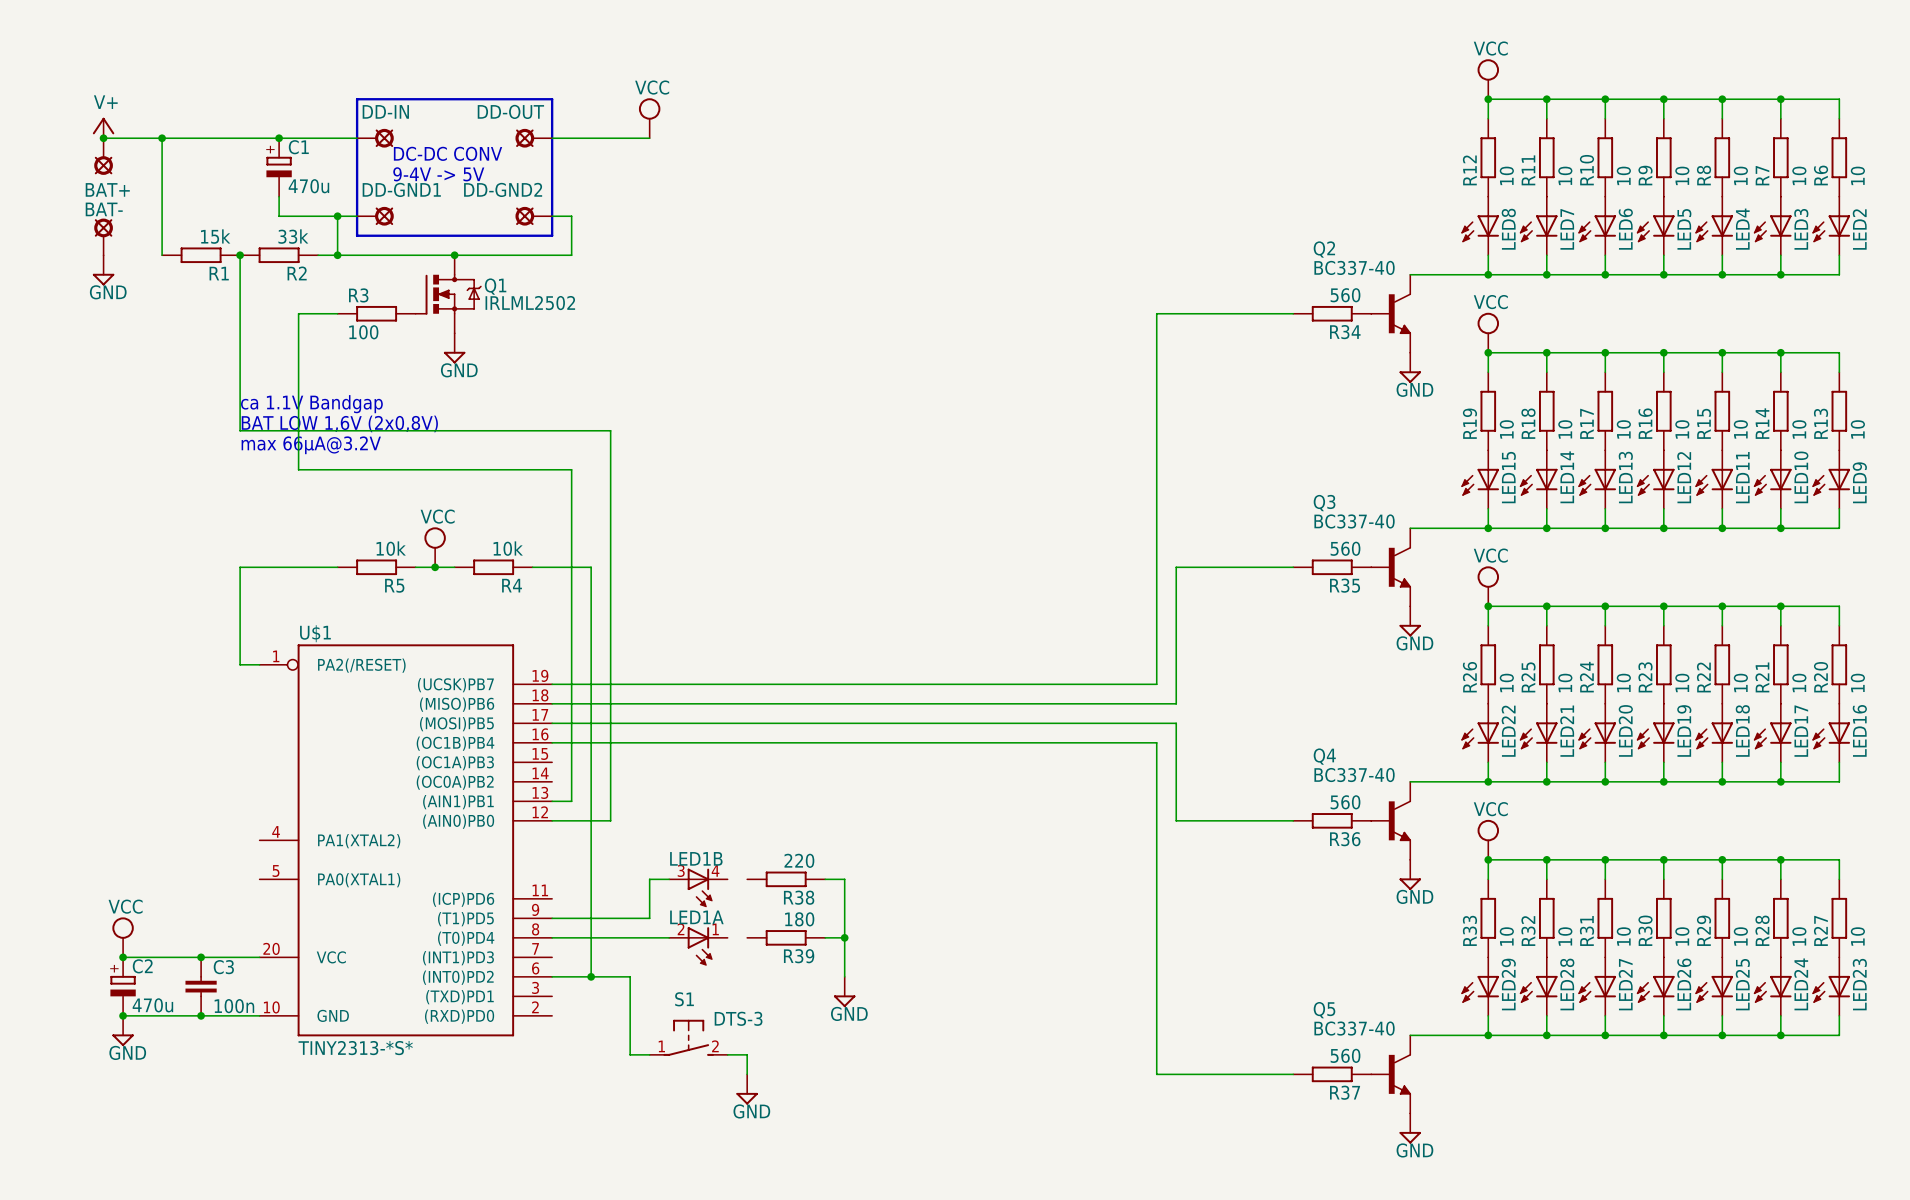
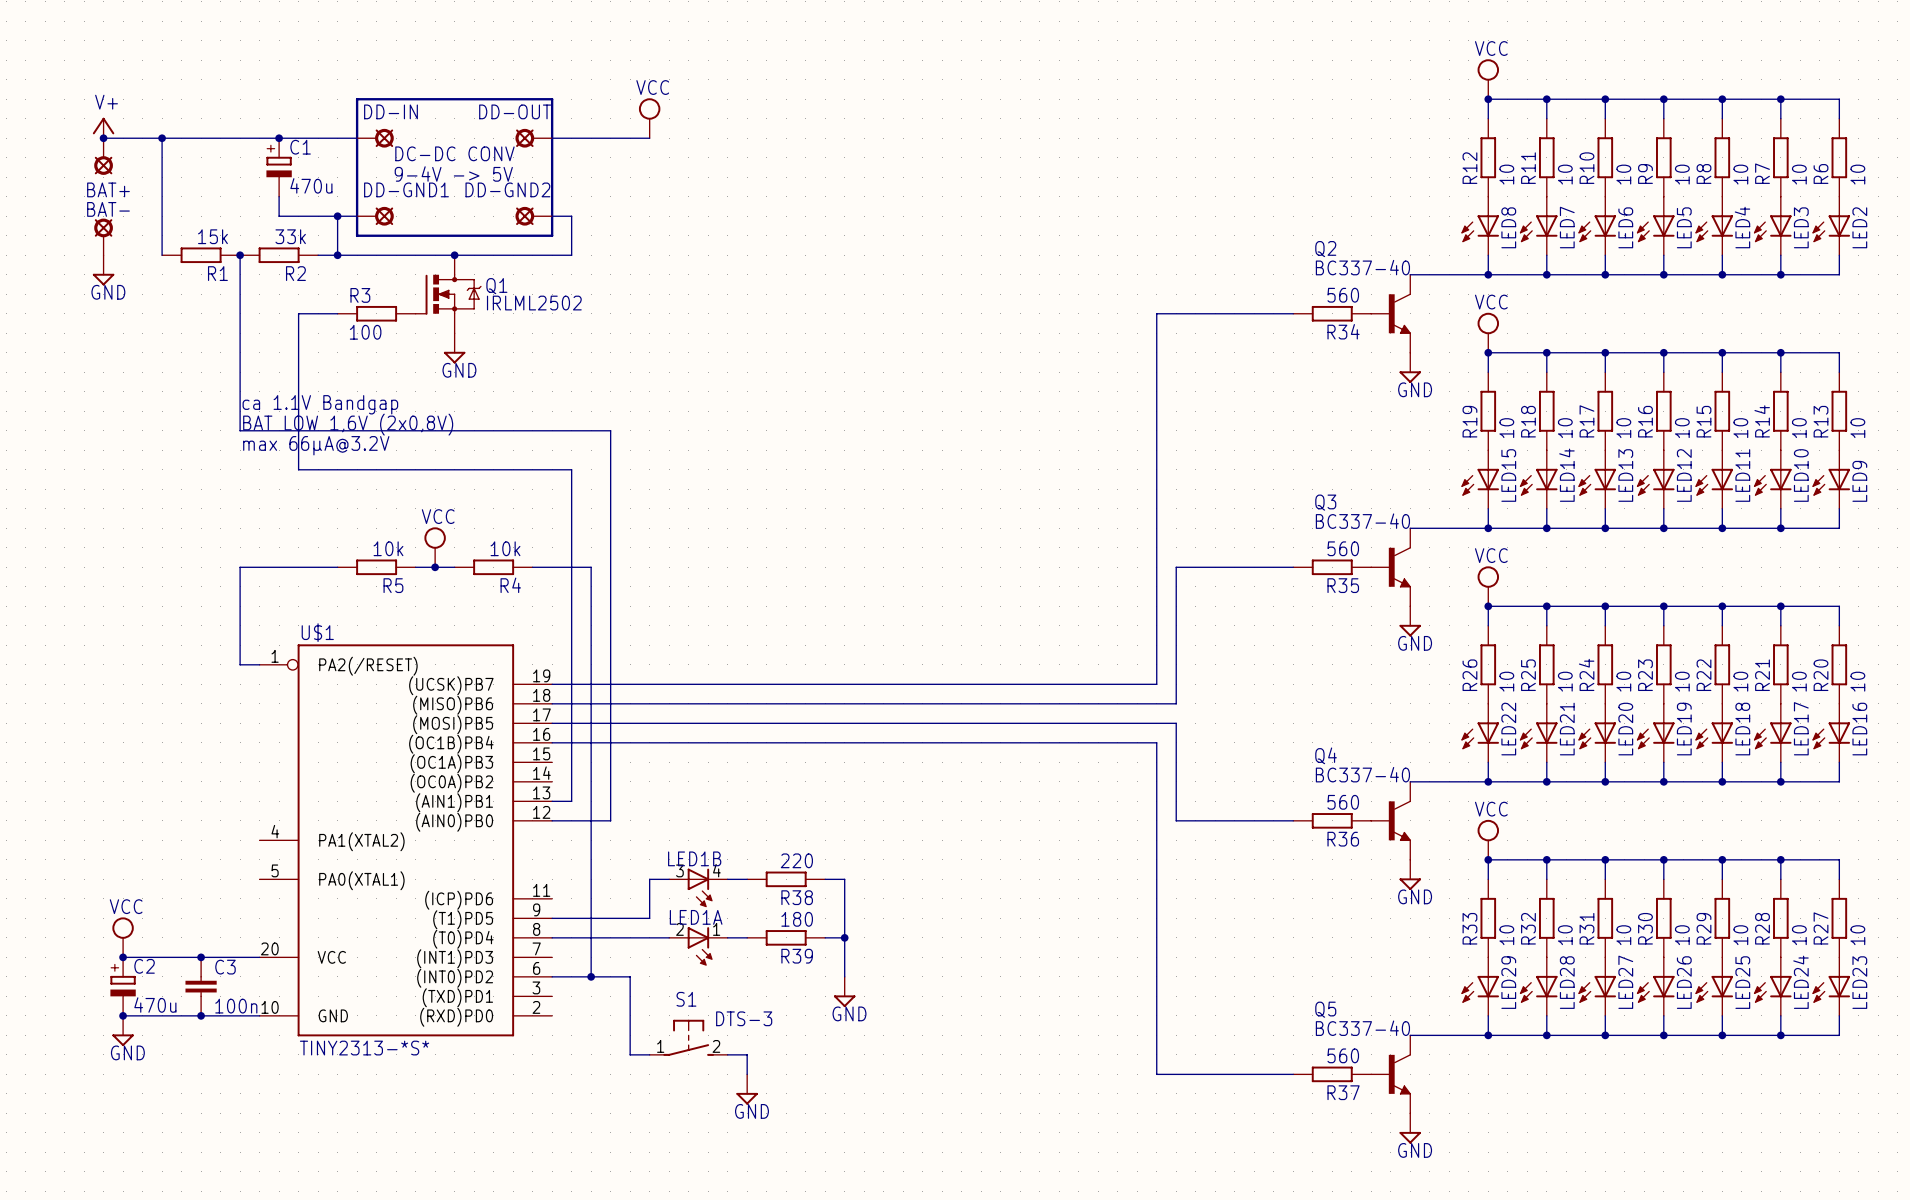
wire: none -> (727, 879) (747, 879)
wire: none -> (727, 937) (747, 937)

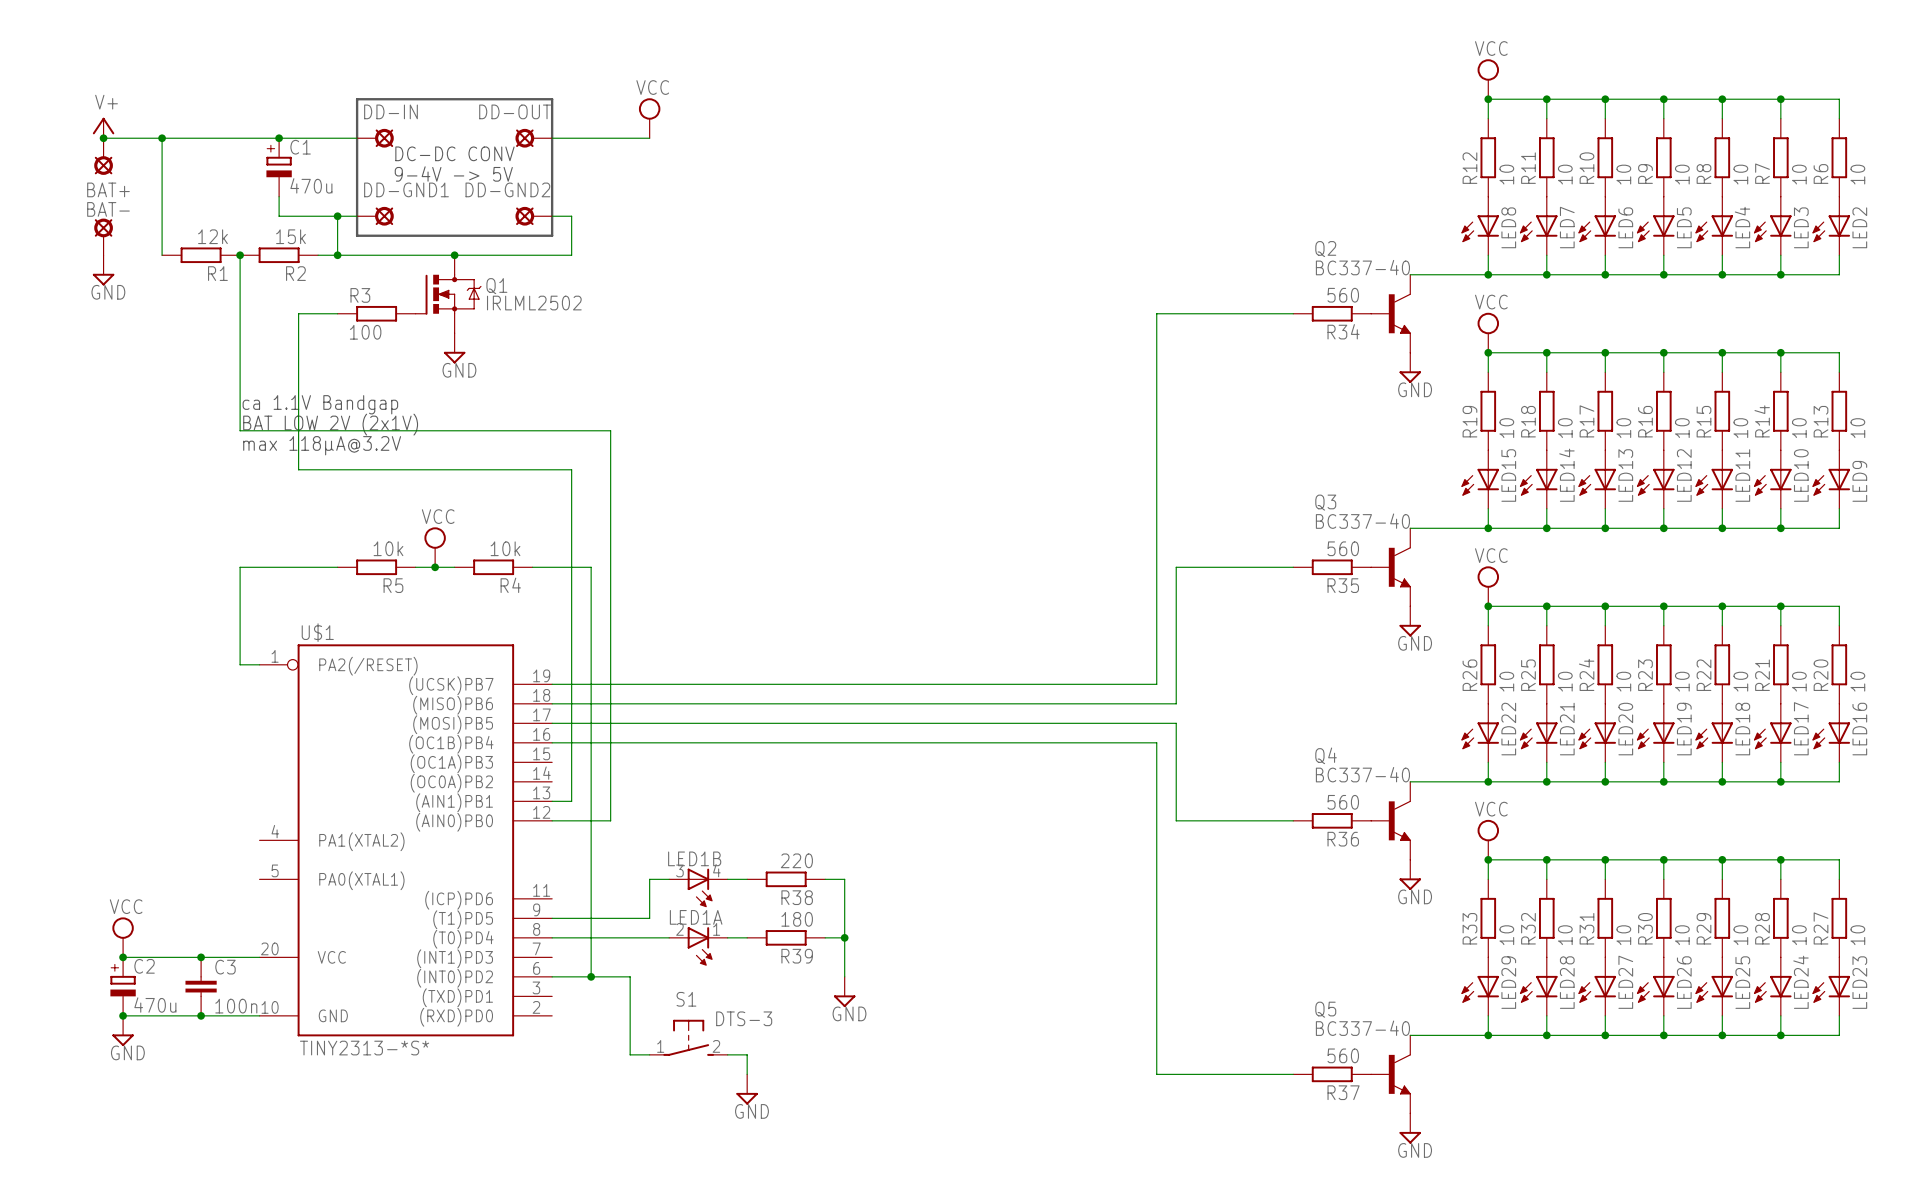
R1 value: 15k (212, 236) -> 12k (212, 236)
R2 value: 33k (290, 236) -> 15k (290, 236)
text: BAT LOW 1,6V (2x0,8V) (348, 424) -> BAT LOW 2V (2x1V) (330, 424)
text: max 66µA@3.2V (316, 445) -> max 118µA@3.2V (322, 445)

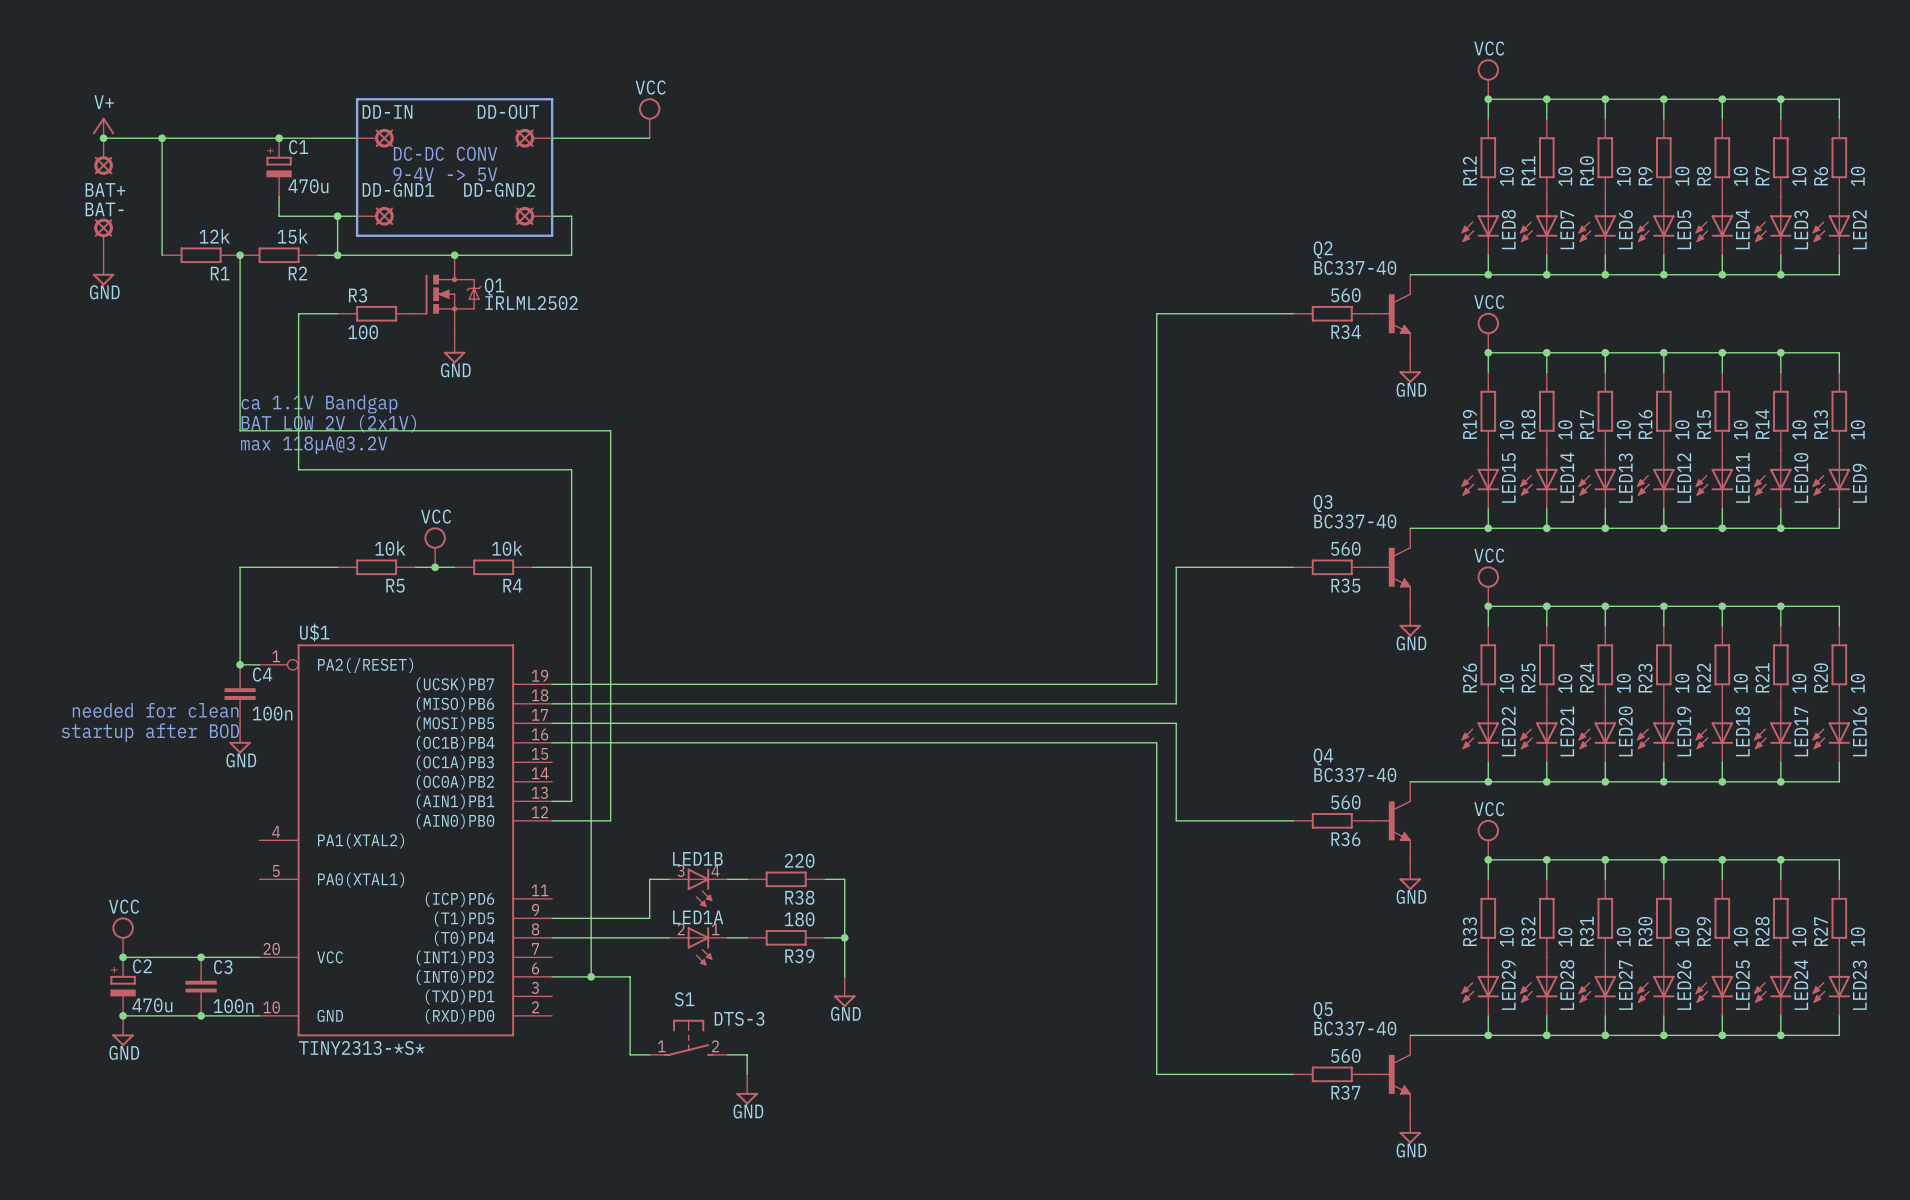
junction: none -> (240, 664)
C4: none -> 100n (240, 694)
text: none -> needed for clean (155, 710)
text: none -> startup after BOD (150, 732)
power symbol: none -> GND (240, 738)

